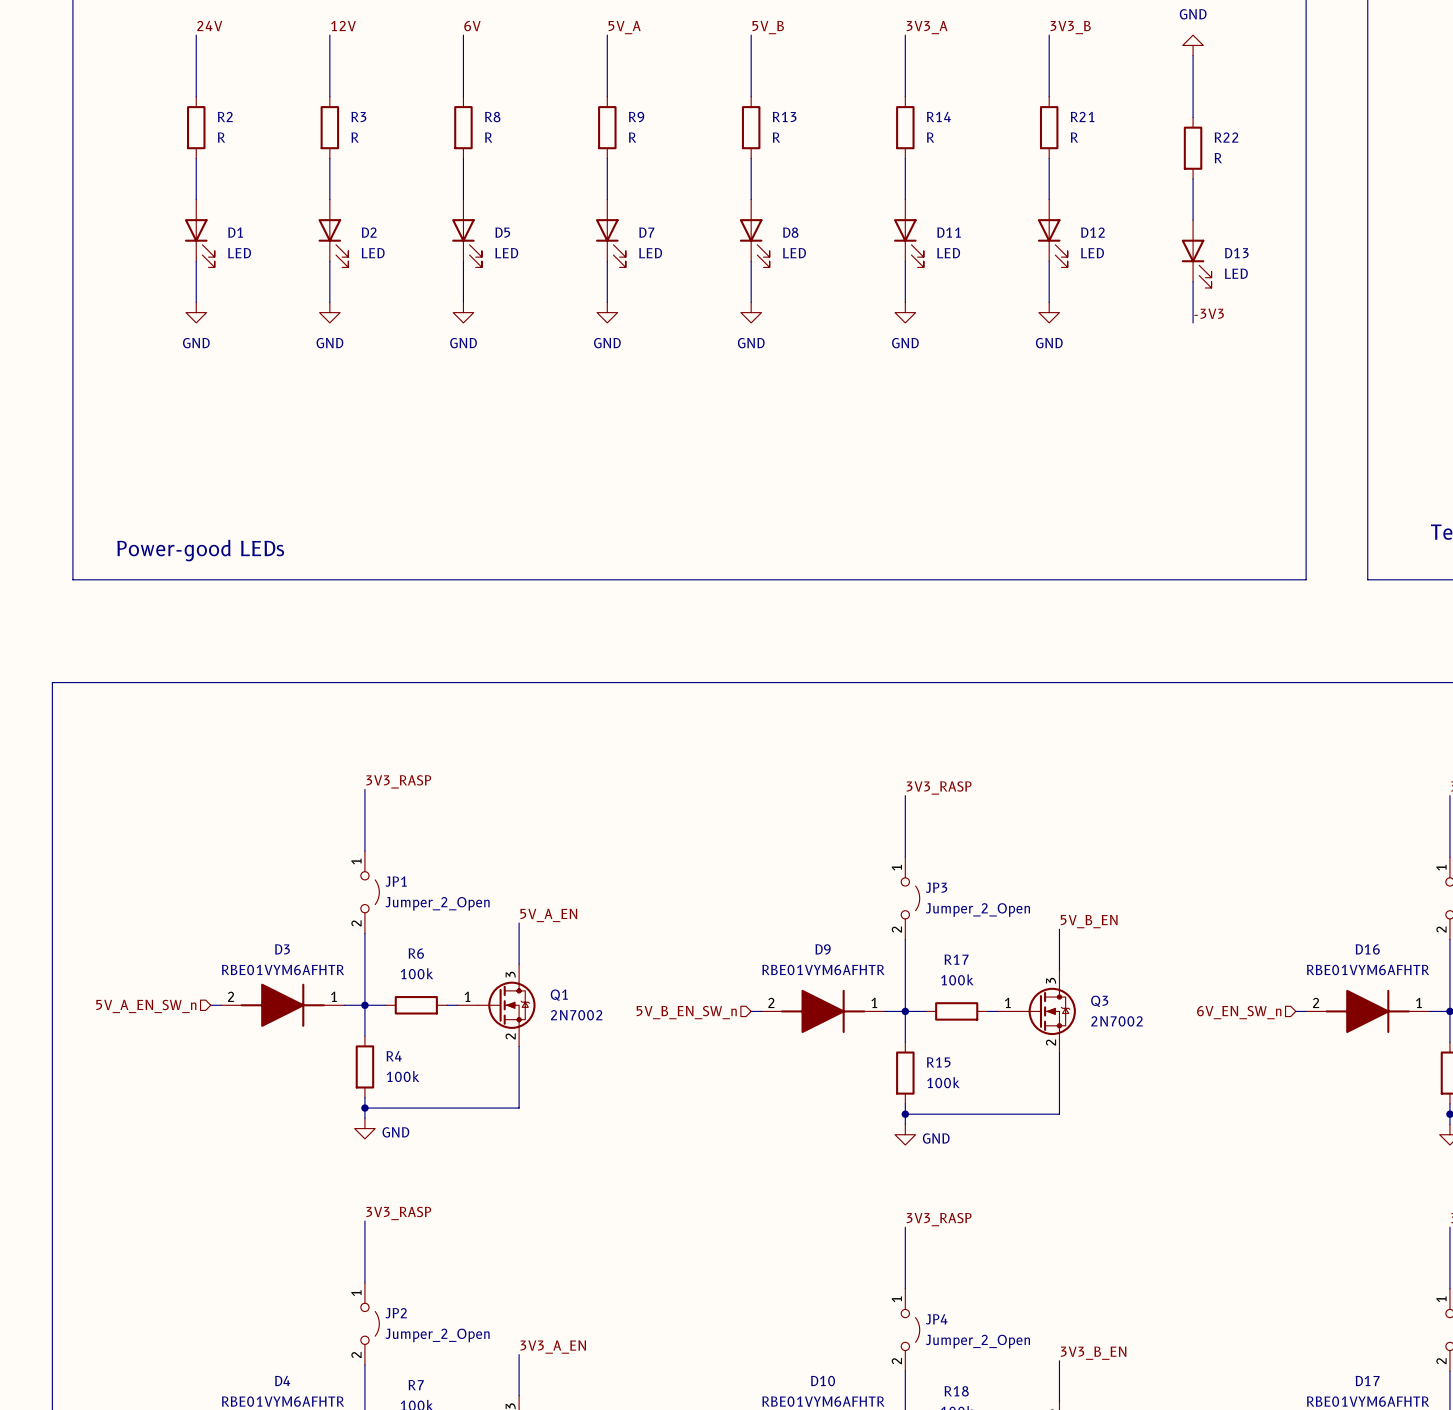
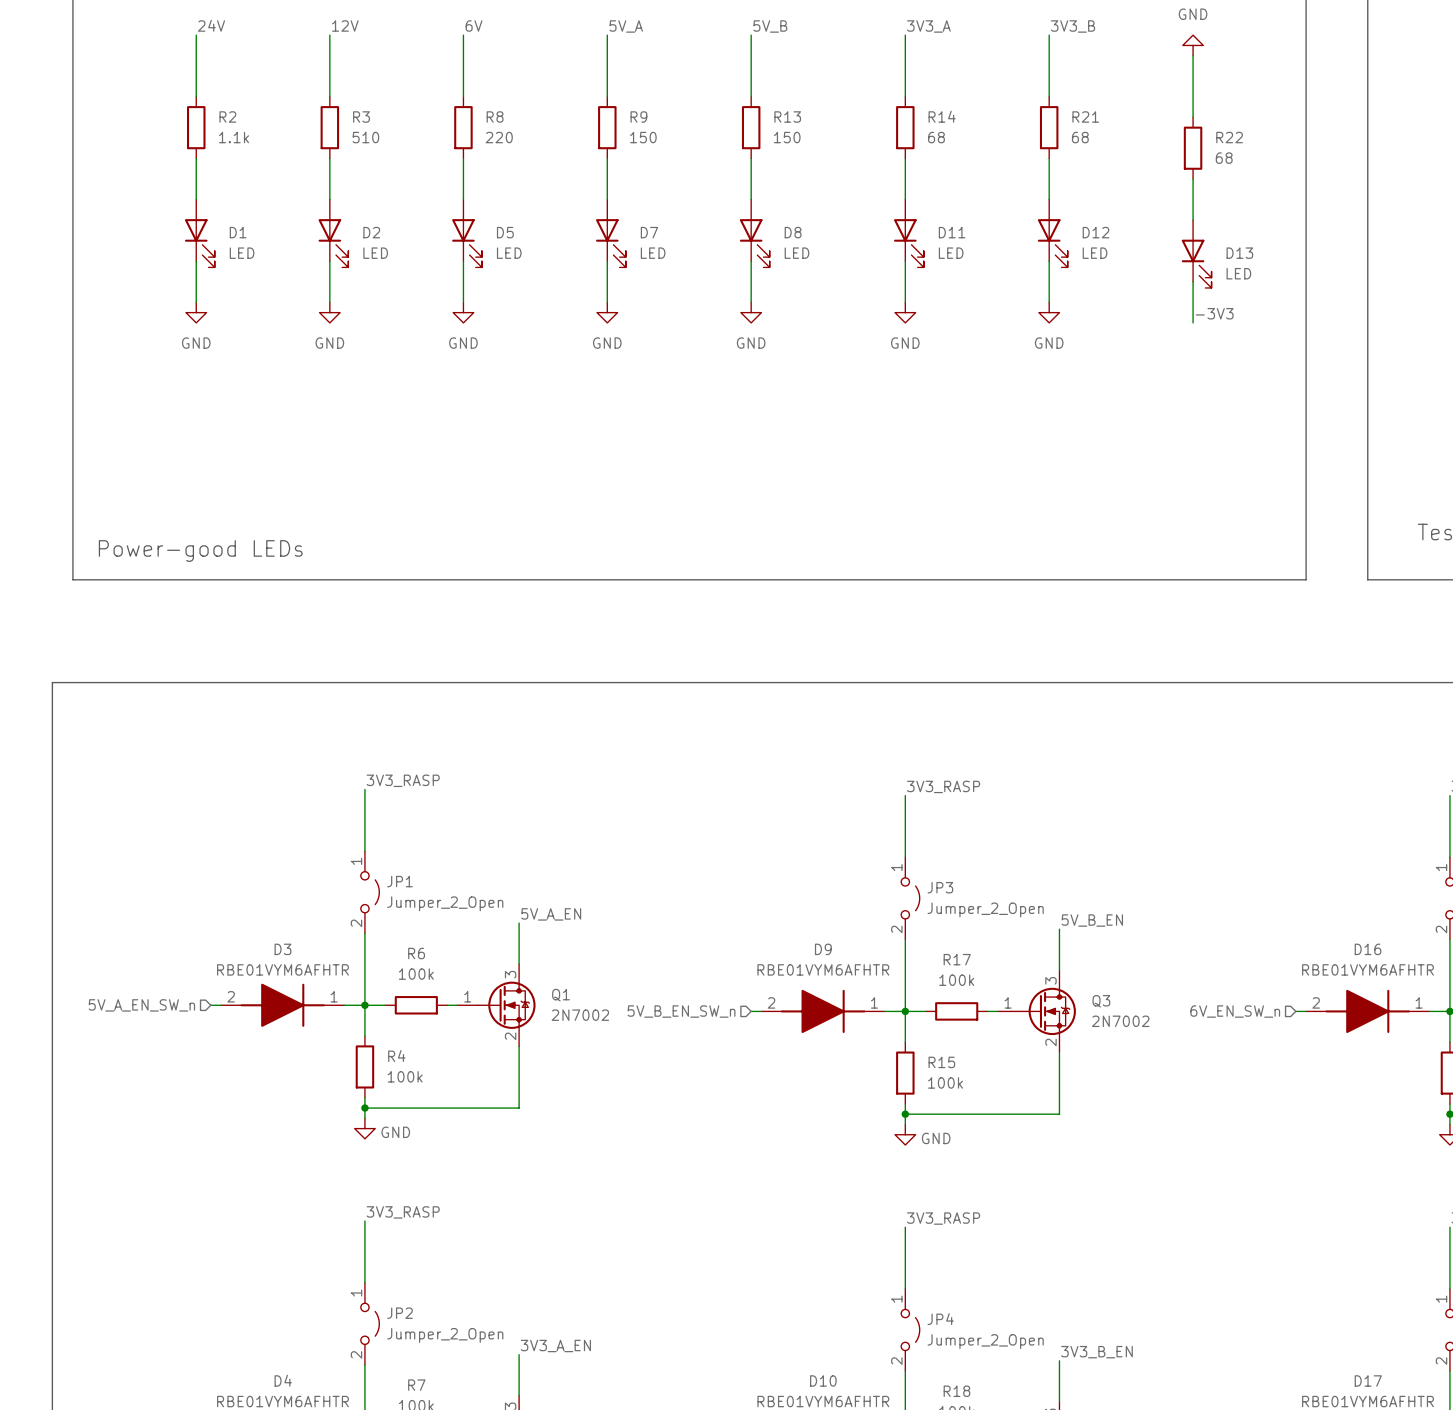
R2 value: R (221, 137) -> 1.1k (234, 137)
R3 value: R (355, 137) -> 510 (365, 137)
R8 value: R (488, 137) -> 220 (499, 137)
R9 value: R (632, 137) -> 150 (643, 137)
R13 value: R (776, 137) -> 150 (787, 137)
R14 value: R (930, 137) -> 68 (936, 137)
R21 value: R (1074, 137) -> 68 (1080, 137)
R22 value: R (1218, 158) -> 68 (1224, 158)

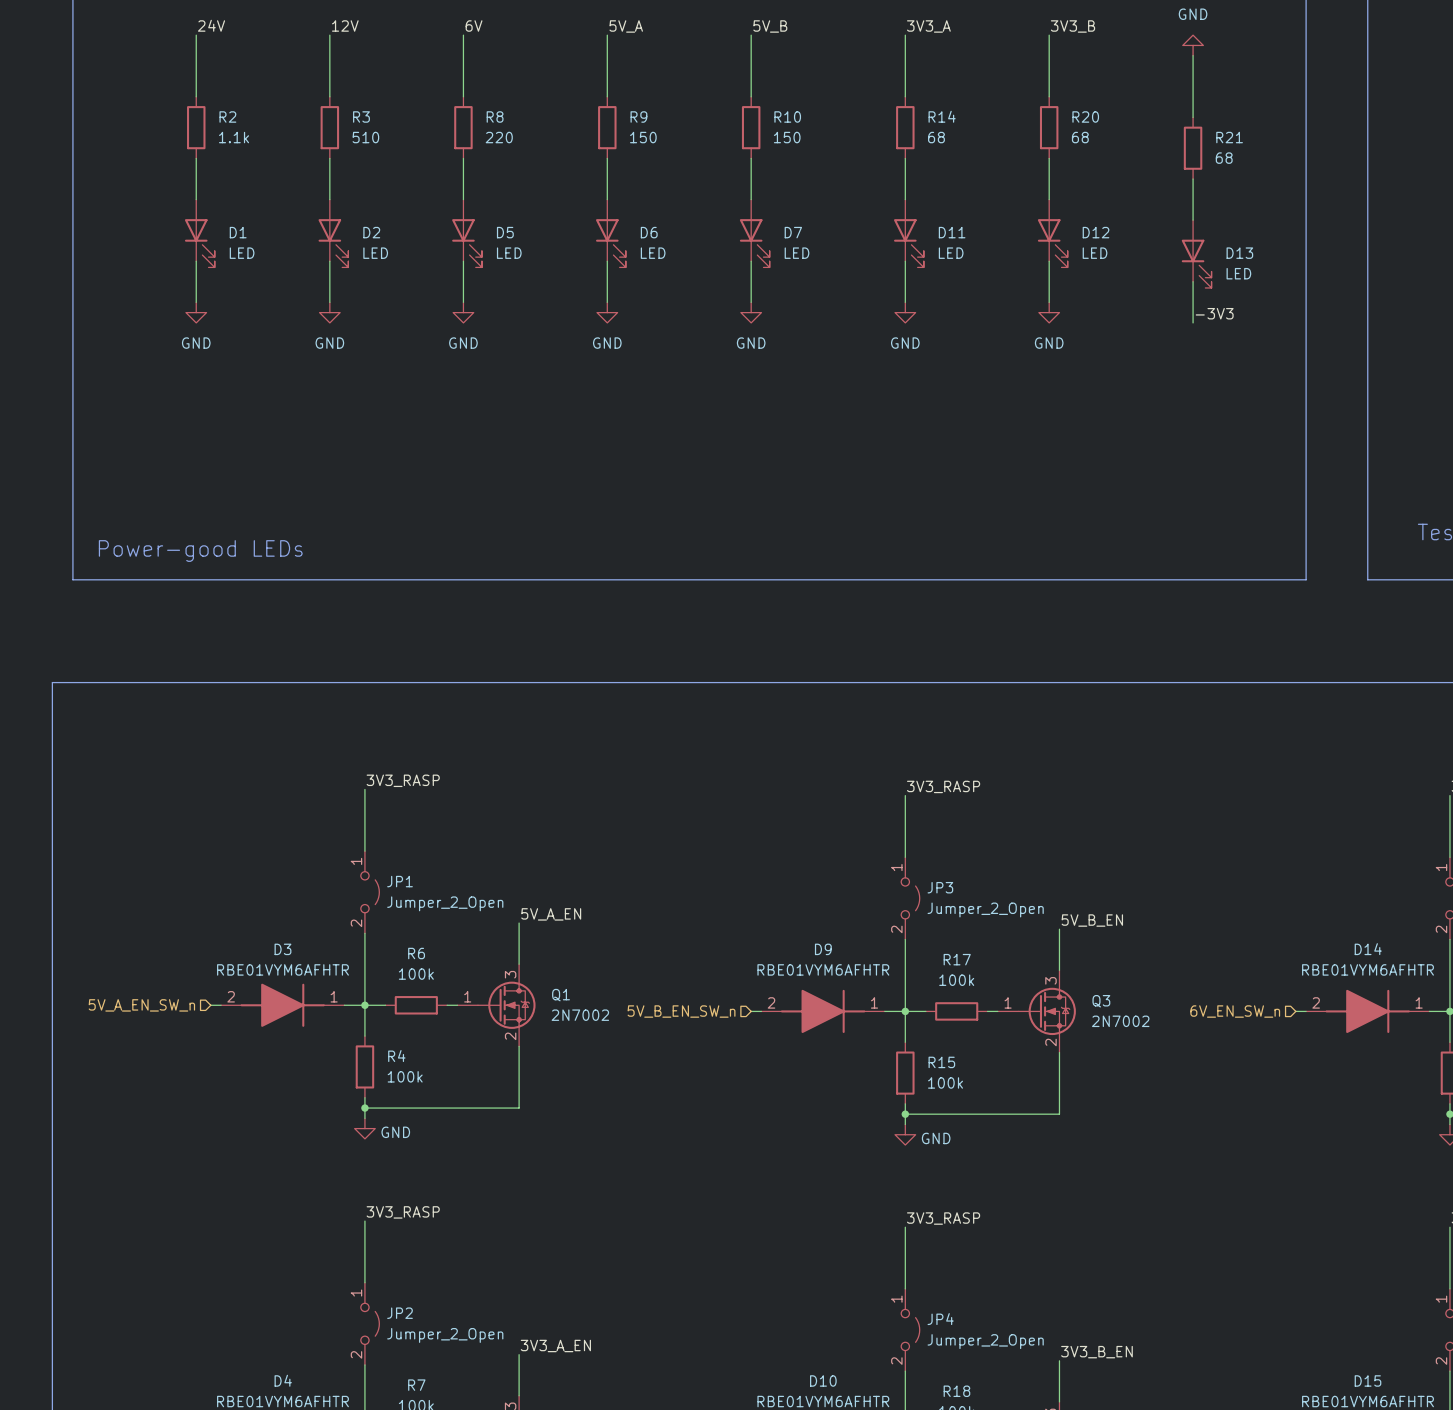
R13 name: R13 (787, 116) -> R10 (787, 116)
R21 name: R21 (1085, 116) -> R20 (1085, 116)
R22 name: R22 (1229, 137) -> R21 (1229, 137)
D7 name: D7 (649, 232) -> D6 (649, 232)
D8 name: D8 (793, 232) -> D7 (793, 232)
D16 name: D16 (1368, 949) -> D14 (1368, 949)
D17 name: D17 (1368, 1380) -> D15 (1368, 1380)

